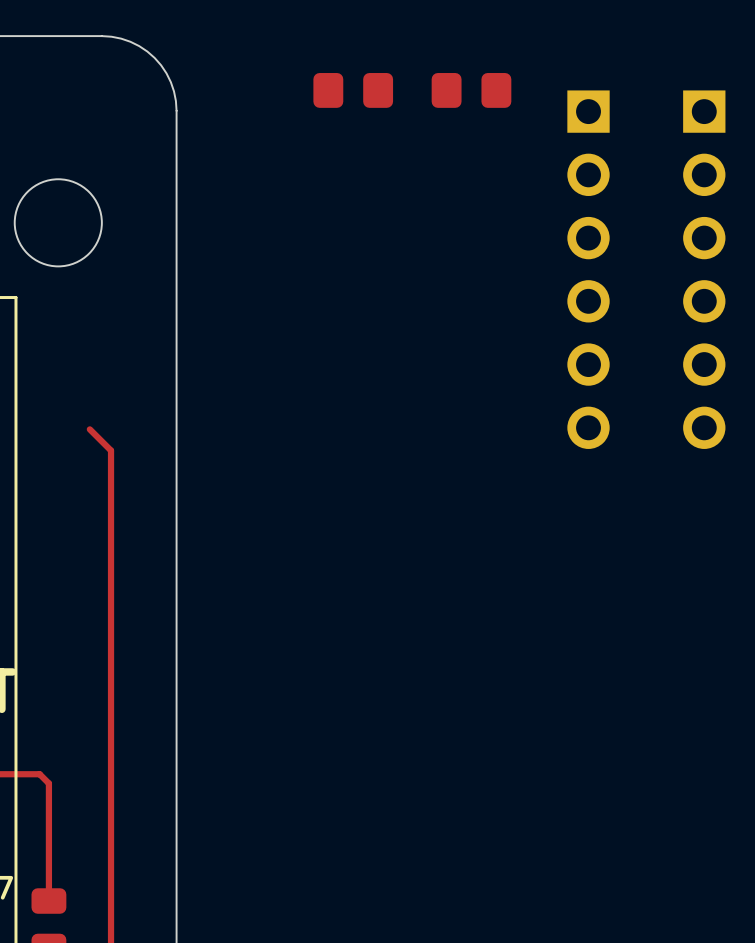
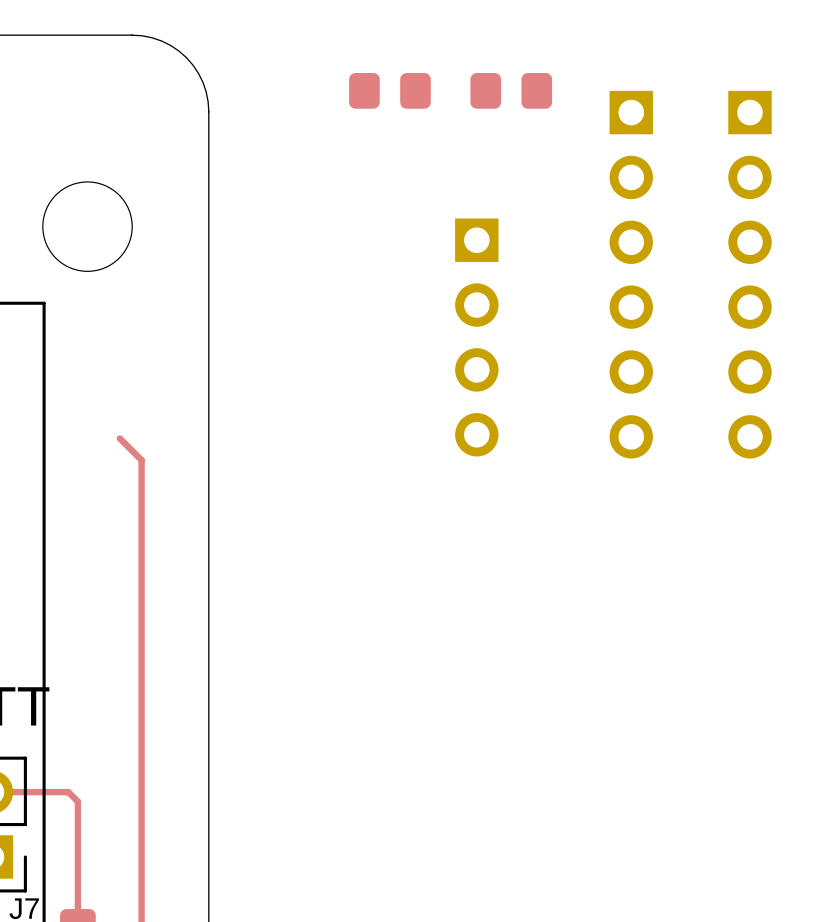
part: none -> (476, 337)

